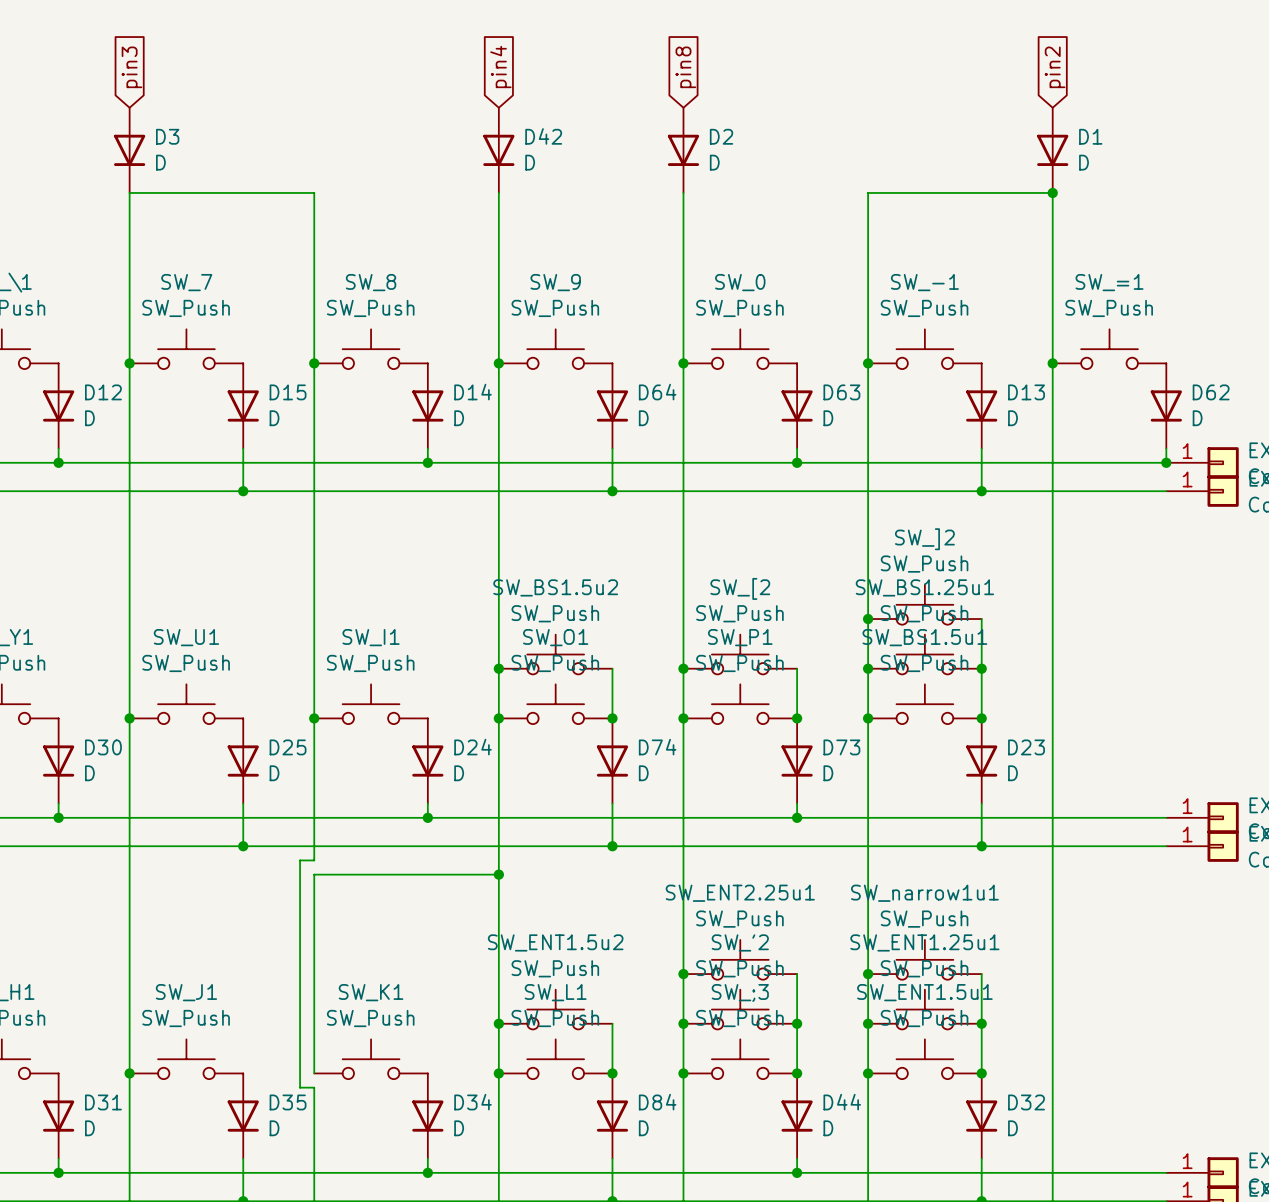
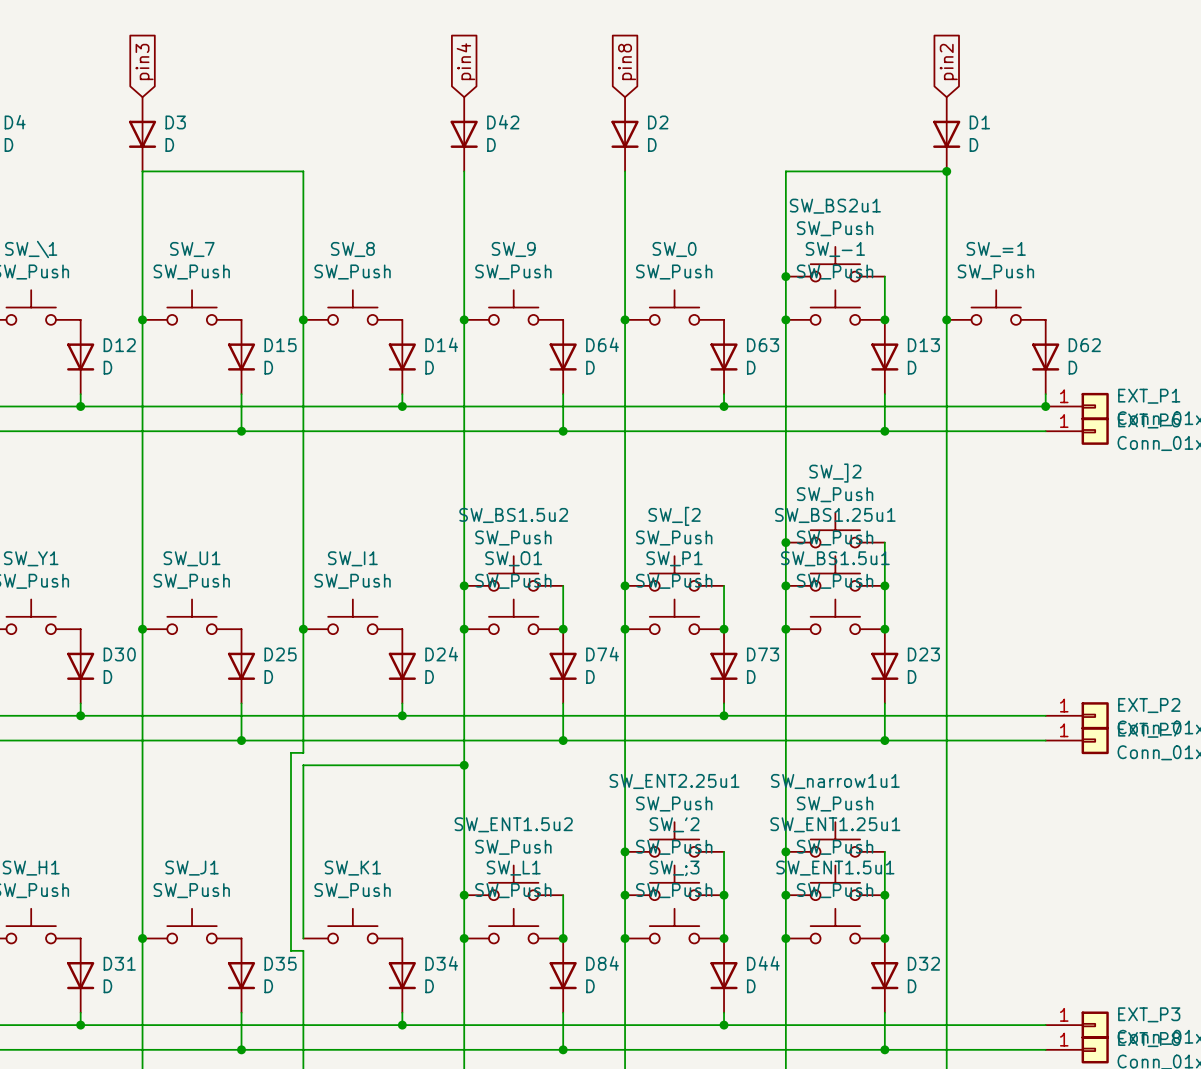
SW_BS2u1: none -> SW_Push (835, 264)
junction: none -> (785, 276)
wire: none -> (884, 276) (884, 319)
junction: none -> (884, 319)

